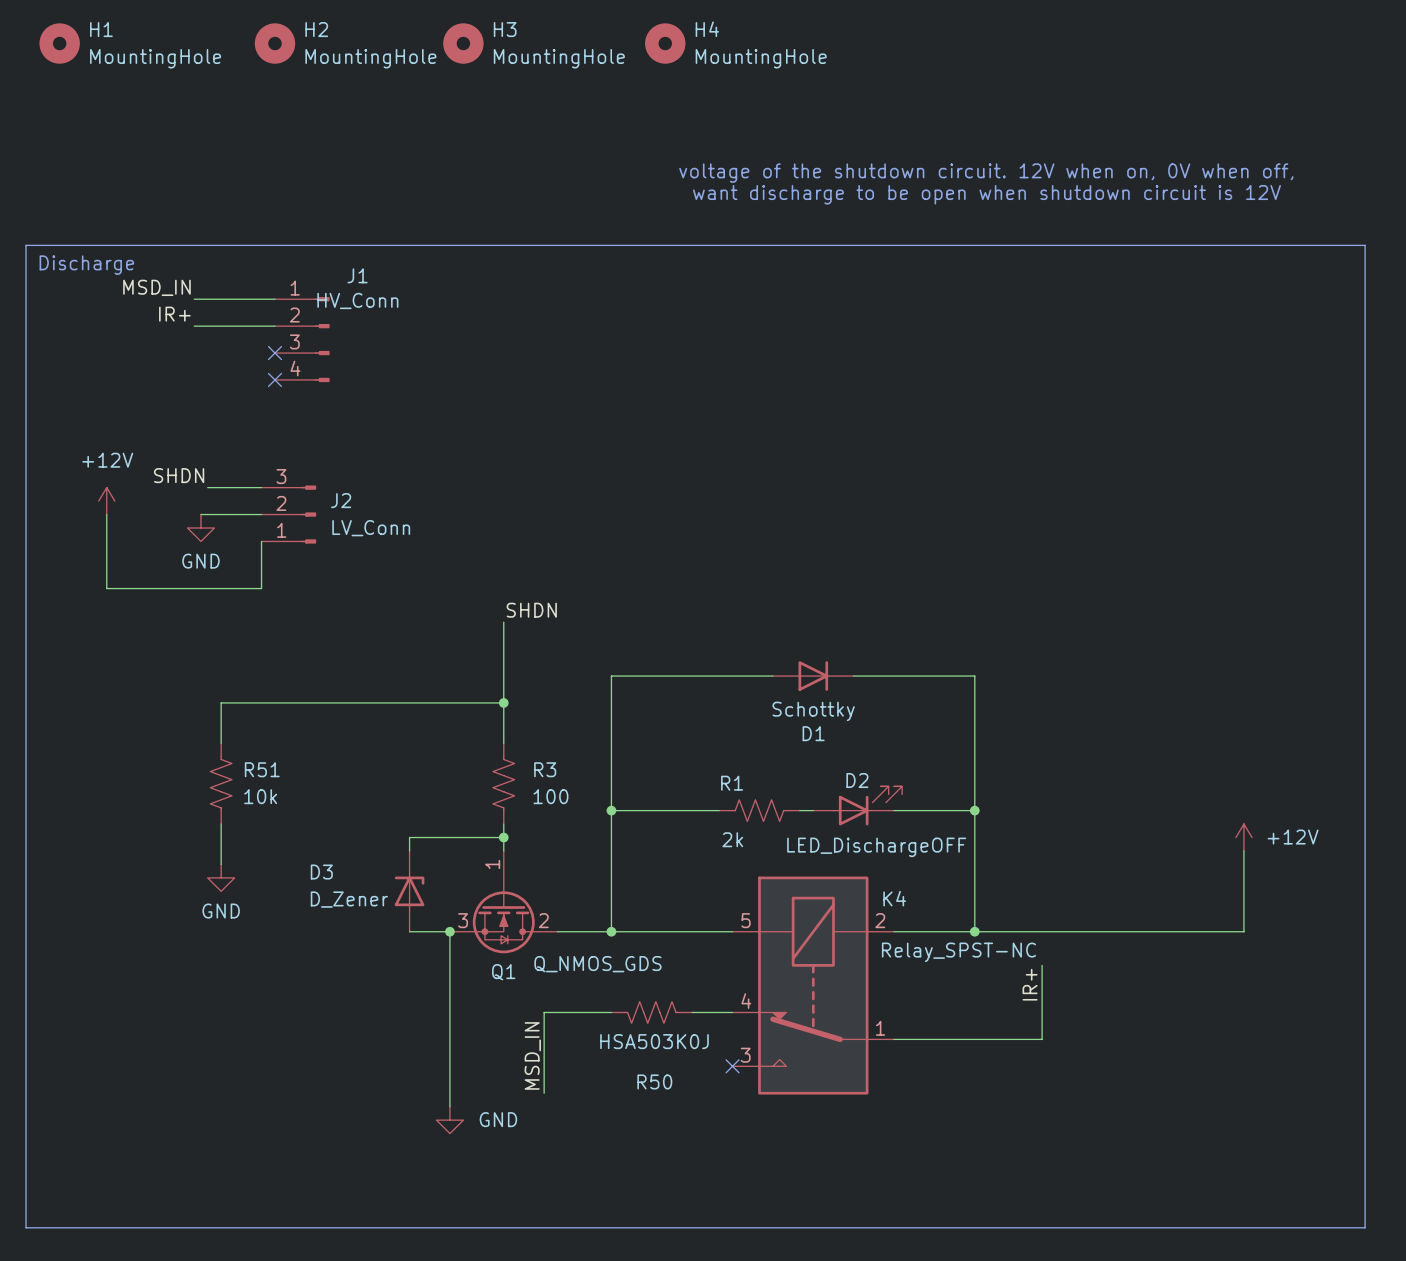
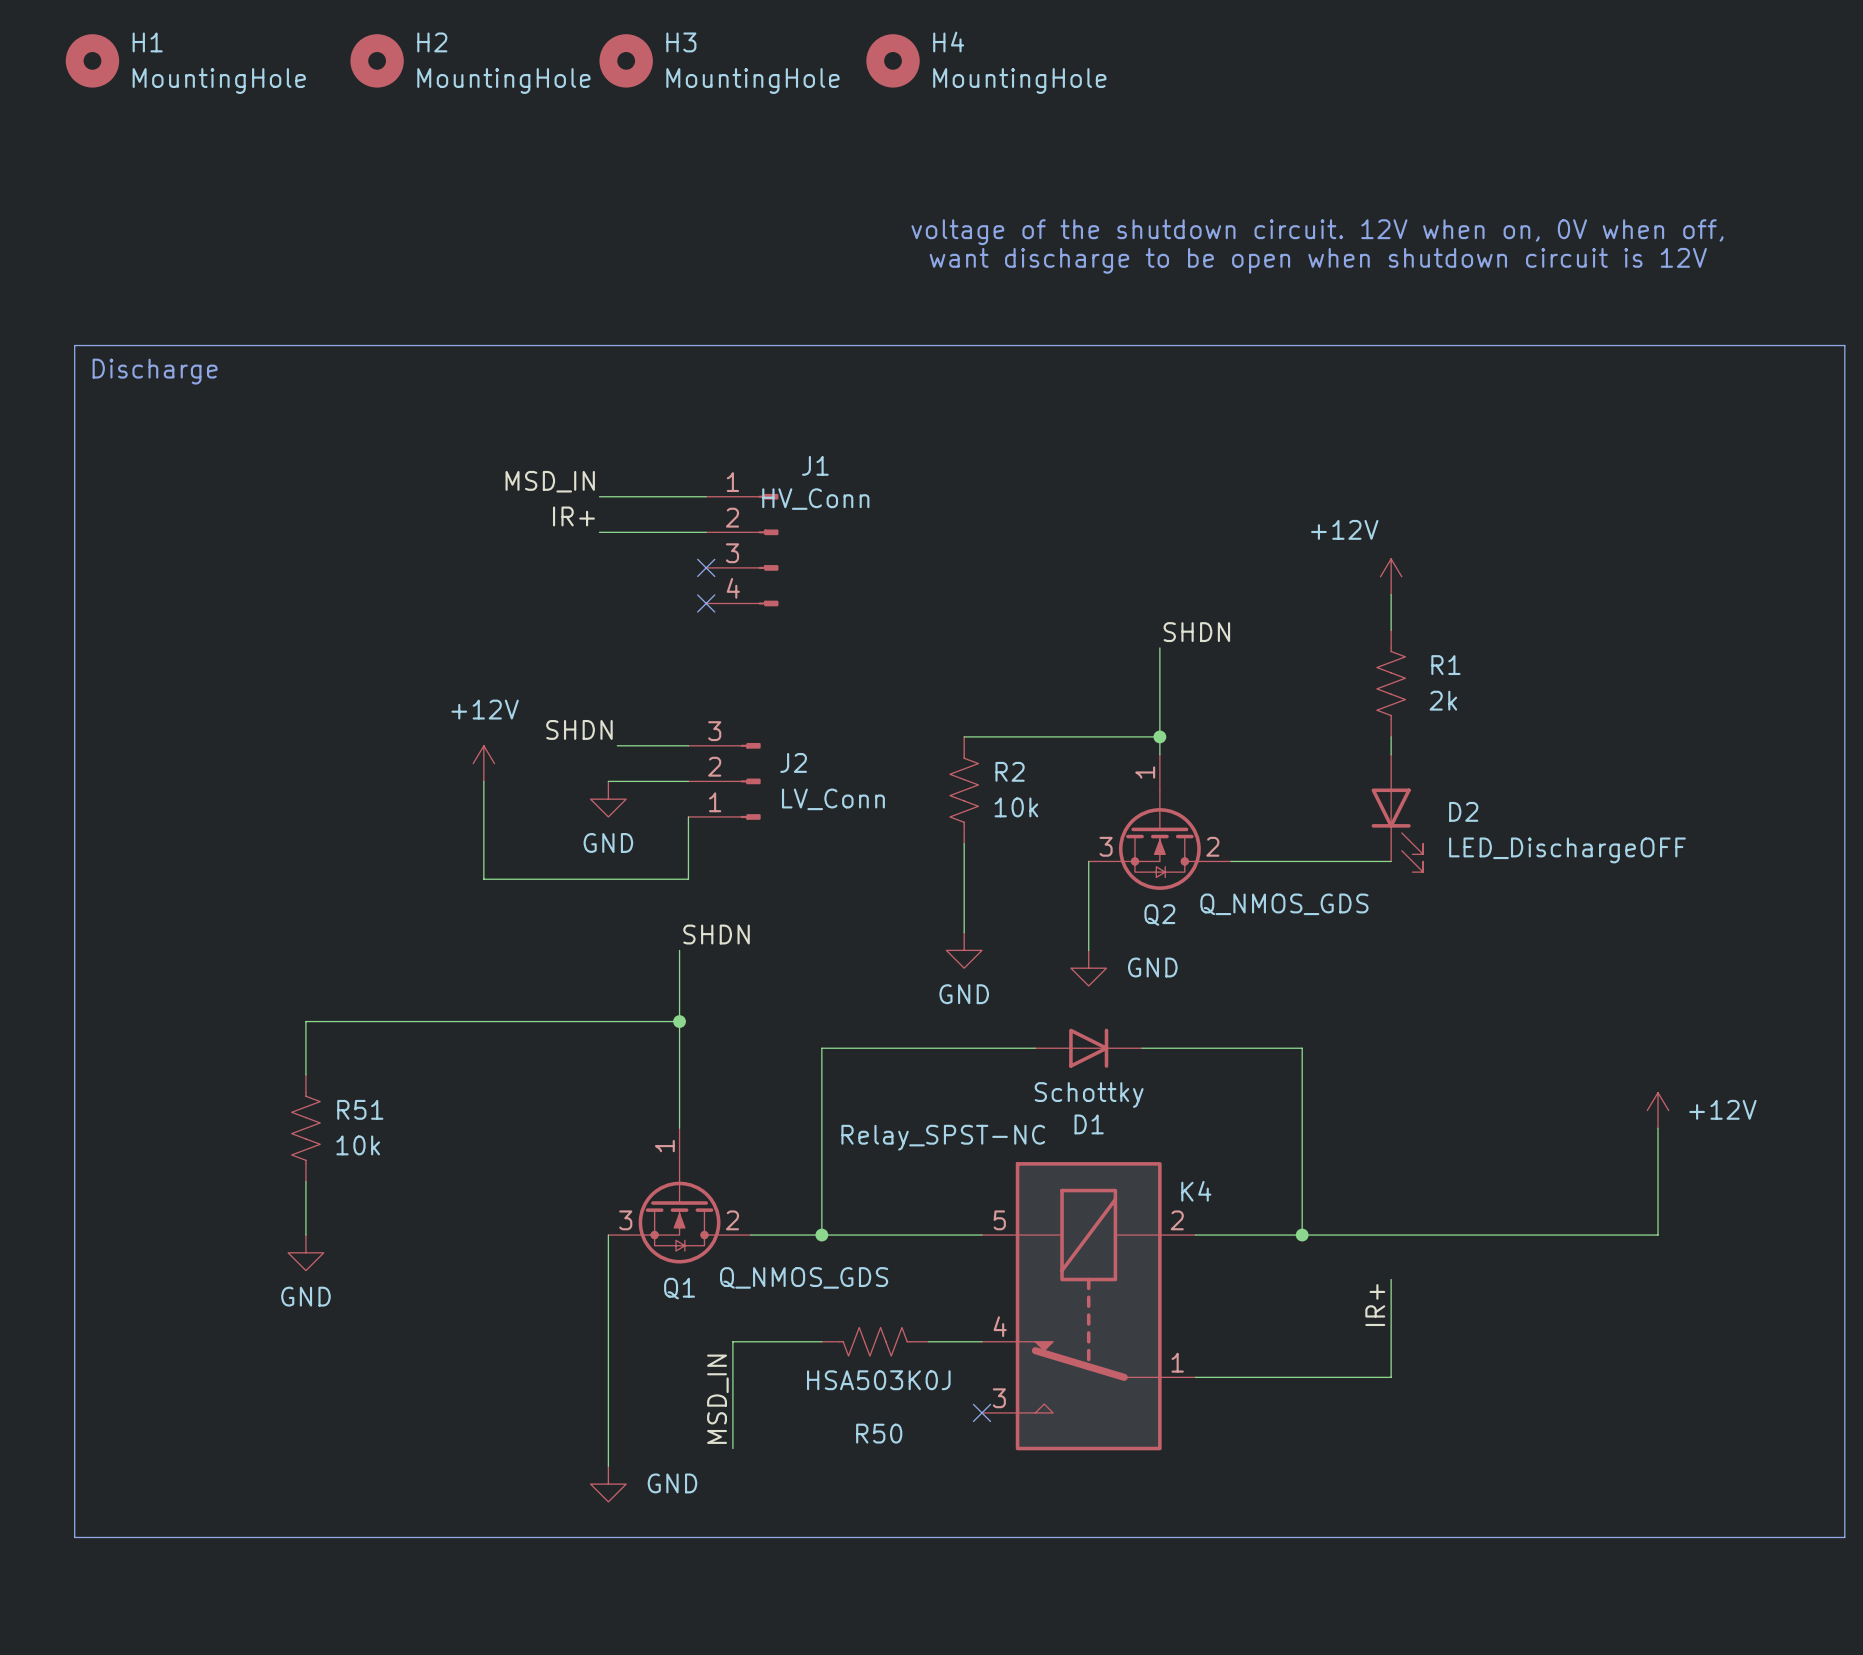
line: (26, 245) (1365, 245) (1365, 1227) (26, 1227) (26, 245) -> (74, 345) (74, 1537) (1844, 1537) (1844, 345) (74, 345)
text position: Discharge (86, 265) -> Discharge (155, 371)
label position: MSD_IN (156, 287) -> MSD_IN (550, 481)
wire: (194, 299) (274, 299) -> (599, 496) (706, 496)
label position: IR+ (174, 314) -> IR+ (573, 516)
wire: (194, 326) (274, 326) -> (599, 532) (706, 532)
J1 position: (302, 339) -> (742, 550)
no-connect mark: (274, 353) -> none
no-connect mark: (274, 379) -> none
no-connect mark: none -> (706, 567)
power symbol: none -> +12V (1391, 576)
wire: none -> (1391, 594) (1391, 630)
no-connect mark: none -> (706, 603)
label: SHDN (179, 475) -> none
label: none -> SHDN (1196, 632)
wire: (207, 487) (261, 487) -> (617, 745) (688, 745)
wire: none -> (1159, 647) (1159, 754)
power symbol position: +12V (106, 501) -> +12V (483, 763)
wire: (106, 514) (106, 588) (261, 588) (261, 541) -> (483, 781) (483, 879) (688, 879) (688, 816)
wire: (200, 514) (261, 514) -> (608, 781) (688, 781)
J2 position: (288, 514) -> (724, 781)
power symbol: GND (200, 528) -> none
label: none -> SHDN (579, 729)
wire: none -> (964, 736) (1159, 736)
junction: none -> (1159, 736)
wire: none -> (1391, 736) (1391, 754)
R2: none -> 10k (964, 790)
power symbol: none -> GND (608, 799)
label: SHDN (531, 610) -> none
Q2: none -> Q_NMOS_GDS (1159, 822)
wire: (503, 622) (503, 716) -> none
wire: none -> (964, 843) (964, 932)
wire: none -> (1088, 861) (1088, 950)
wire: none -> (1231, 861) (1391, 861)
wire: (772, 676) (611, 676) (611, 790) -> (1035, 1048) (821, 1048)
D1 position: (813, 676) -> (1088, 1048)
wire: (853, 676) (974, 676) (974, 790) -> (1142, 1048) (1302, 1048)
wire: (503, 702) (221, 702) (221, 743) -> (679, 1021) (305, 1021) (305, 1074)
junction: (503, 702) -> none
label: none -> SHDN (716, 934)
power symbol: none -> GND (964, 950)
power symbol: none -> GND (1088, 968)
wire: none -> (679, 985) (679, 1092)
junction: none -> (679, 1021)
D2 name position: D2 (857, 780) -> D2 (1463, 811)
R51 position: (221, 783) -> (305, 1128)
R3: 100 (503, 783) -> none
R1 name position: R1 (732, 783) -> R1 (1445, 665)
D2 position: (857, 805) -> (1397, 813)
D2 rotation: 0° (870, 805) -> 90° clockwise (1397, 830)
wire: (611, 810) (719, 810) -> none
junction: (611, 810) -> none
R1 rotation: 0° (759, 810) -> 90° clockwise (1391, 683)
R1 position: (759, 810) -> (1391, 683)
wire: (799, 810) (813, 810) -> none
wire: (894, 810) (974, 810) -> none
junction: (974, 810) -> none
wire: (221, 824) (221, 864) -> (305, 1181) (305, 1235)
wire: (503, 837) (409, 837) (409, 850) -> none
junction: (503, 837) -> none
R1 value position: 2k (732, 839) -> 2k (1443, 700)
D2 value position: LED_DischargeOFF (876, 847) -> LED_DischargeOFF (1567, 850)
power symbol position: GND (221, 877) -> GND (305, 1252)
D3: D_Zener (409, 891) -> none
wire: (409, 931) (449, 931) -> none
junction: (449, 931) -> none
K4 value position: Relay_SPST-NC (958, 952) -> Relay_SPST-NC (943, 1137)

